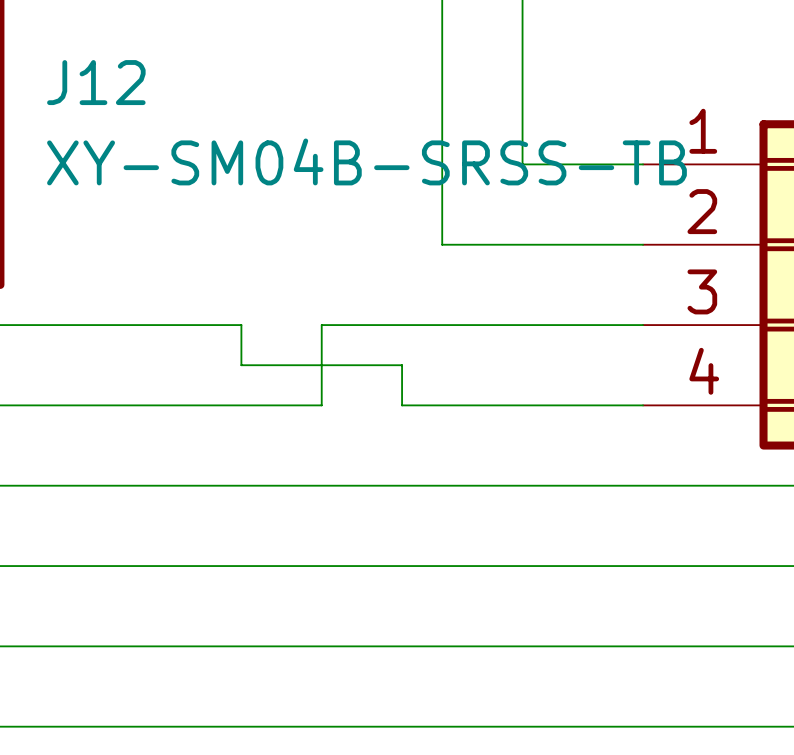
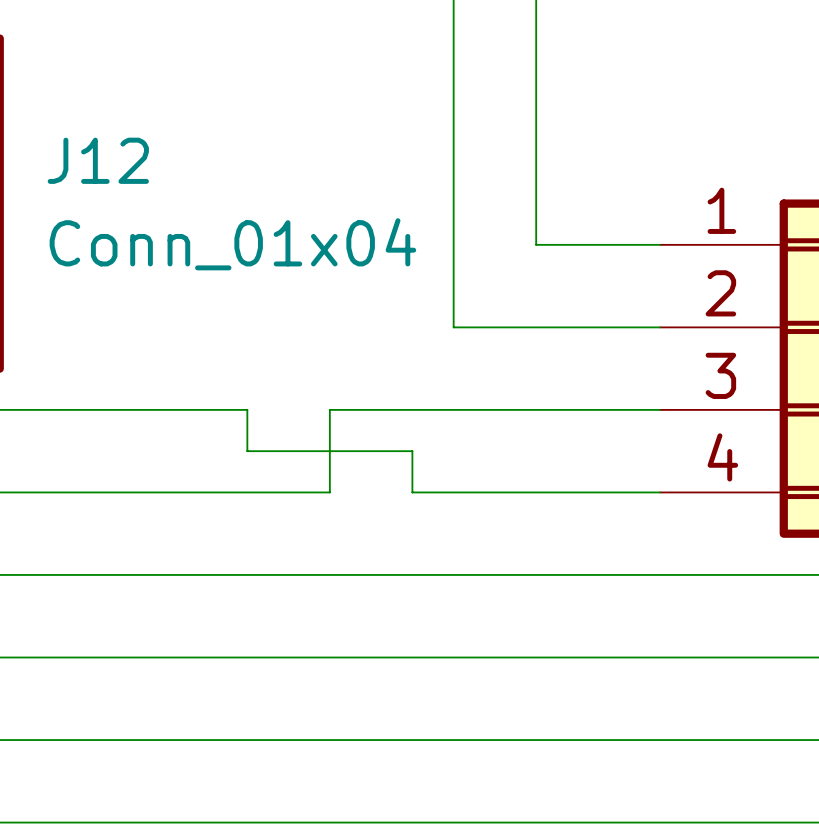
J12 value: XY-SM04B-SRSS-TB (366, 161) -> Conn_01x04 (232, 244)

